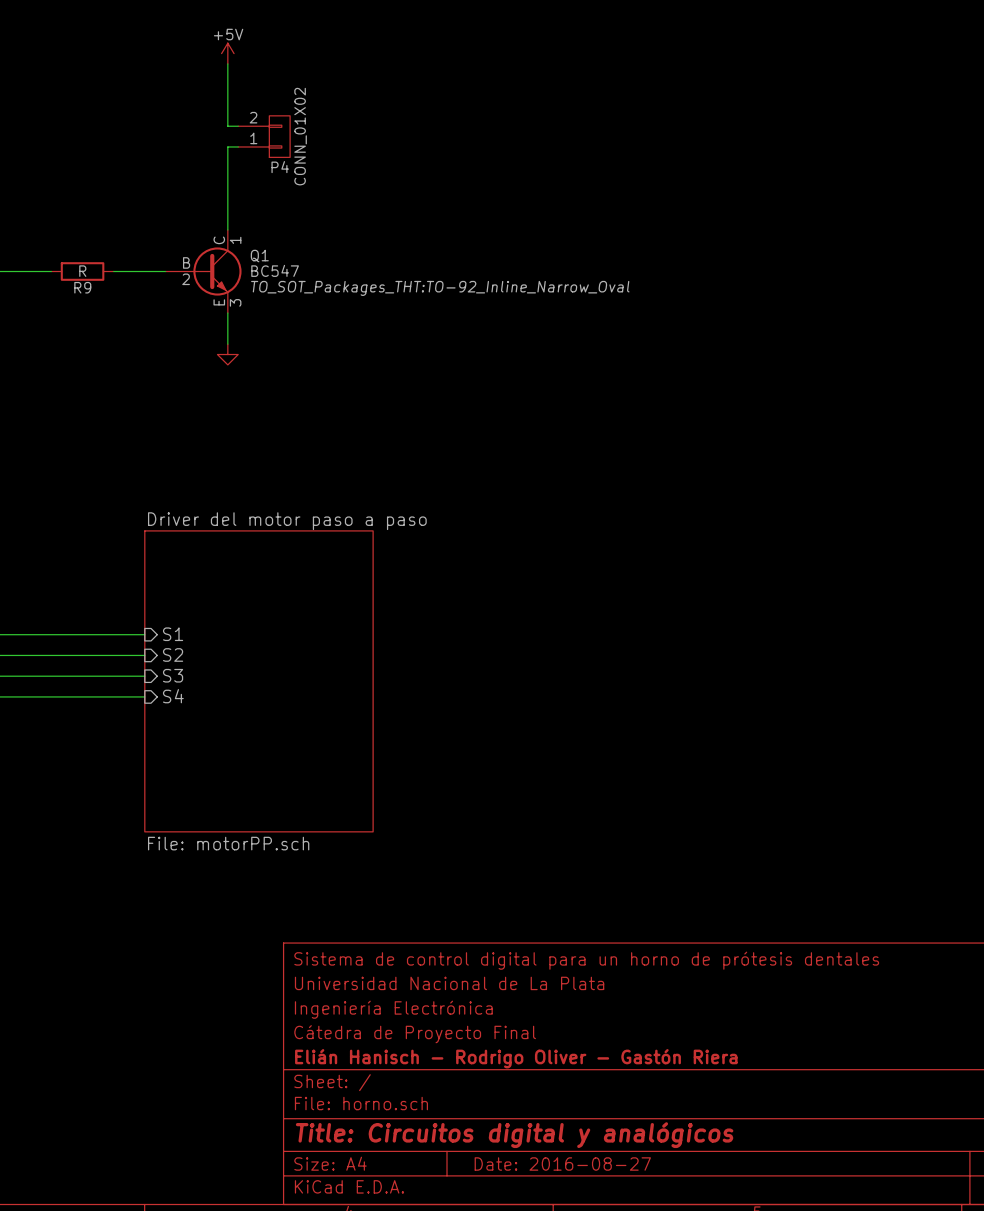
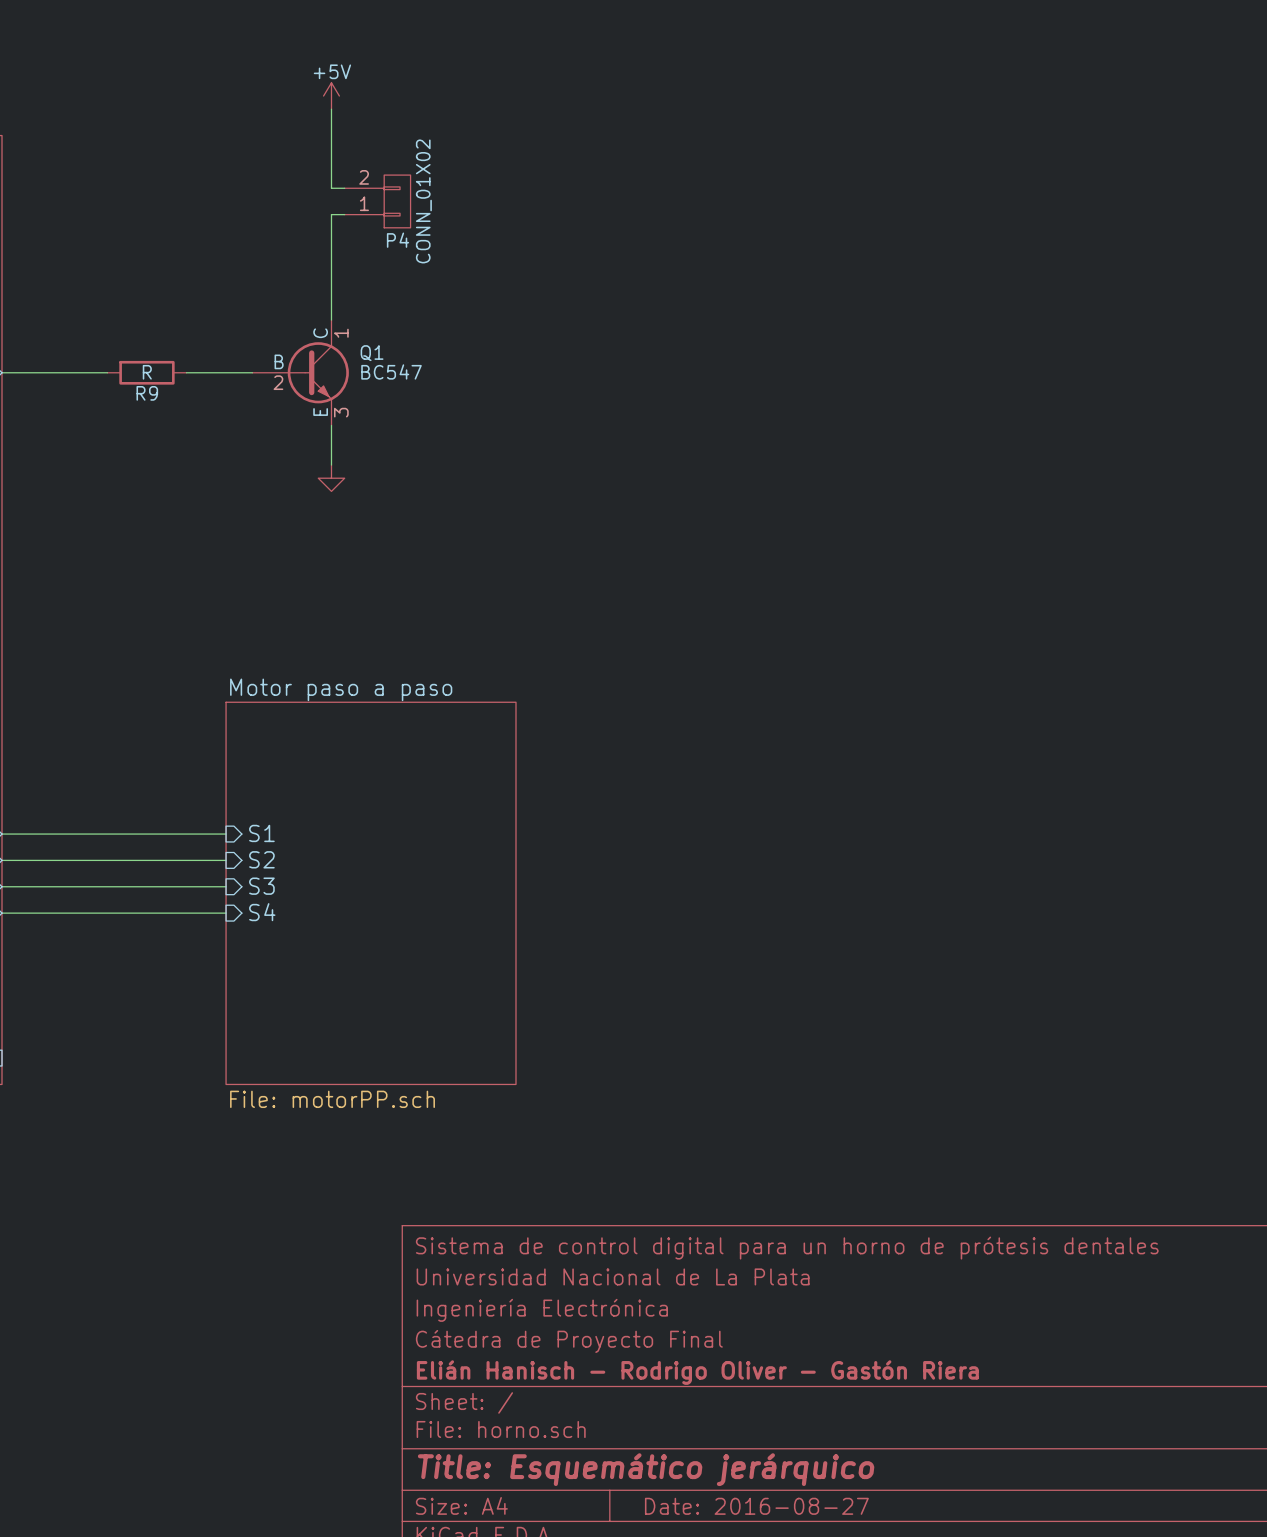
Q1 text: TO_SOT_Packages_THT:TO-92_Inline_Narrow_Oval (440, 288) -> none
sheet Driver del motor paso a paso name: Driver del motor paso a paso (287, 521) -> Motor paso a paso (341, 689)
title block: Title: Circuitos digital y analógicos (514, 1135) -> Title: Esquemático jerárquico (646, 1469)

